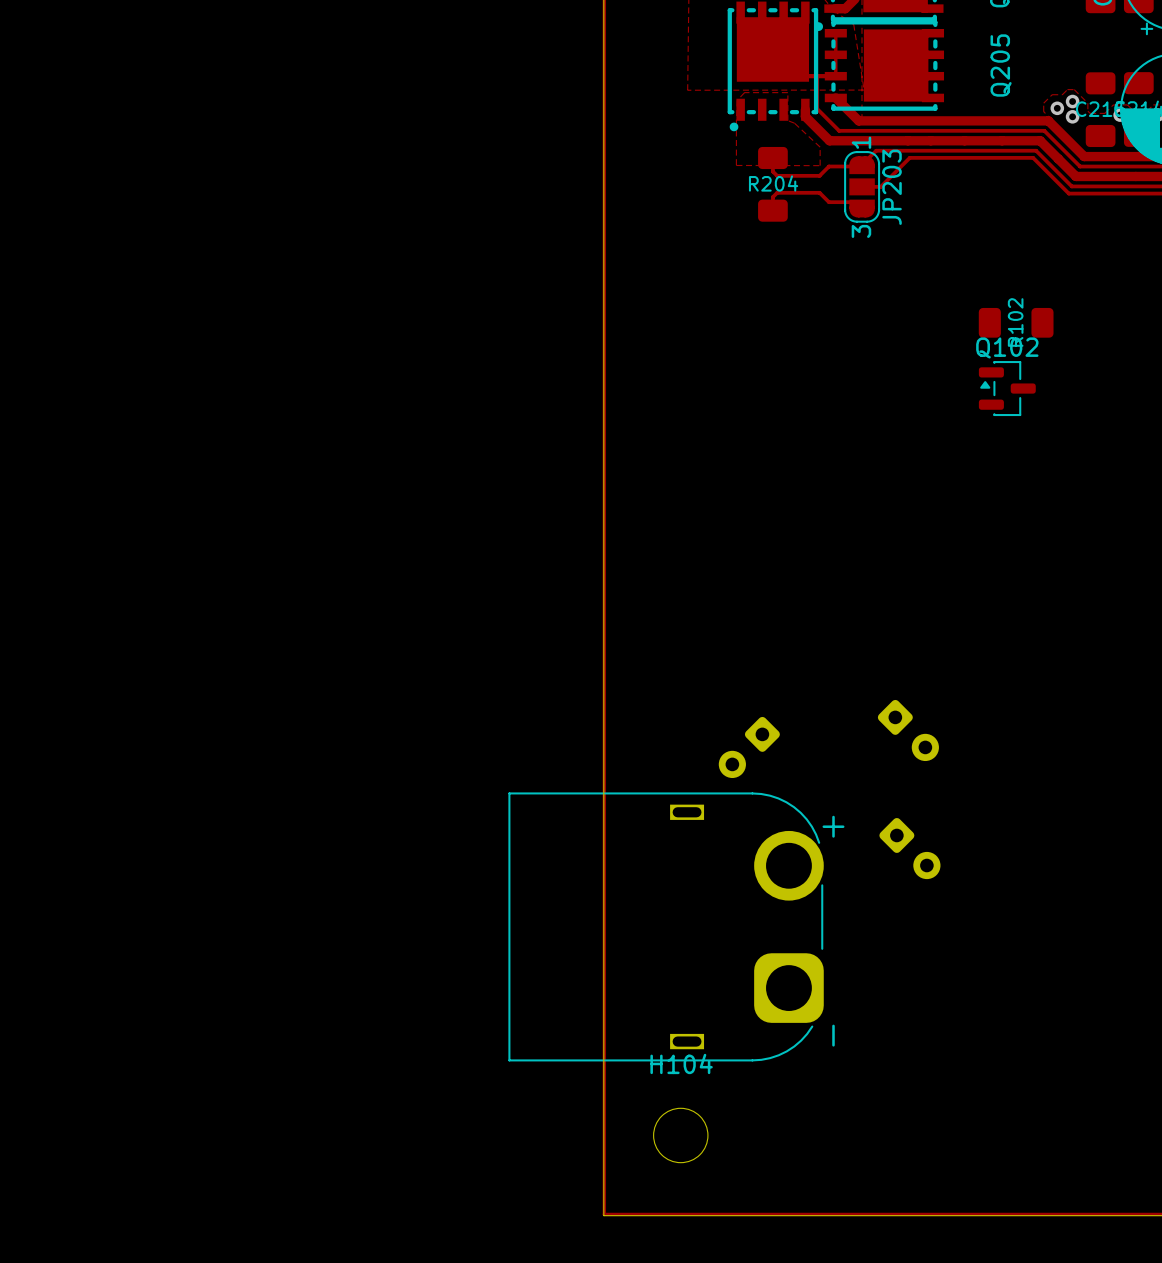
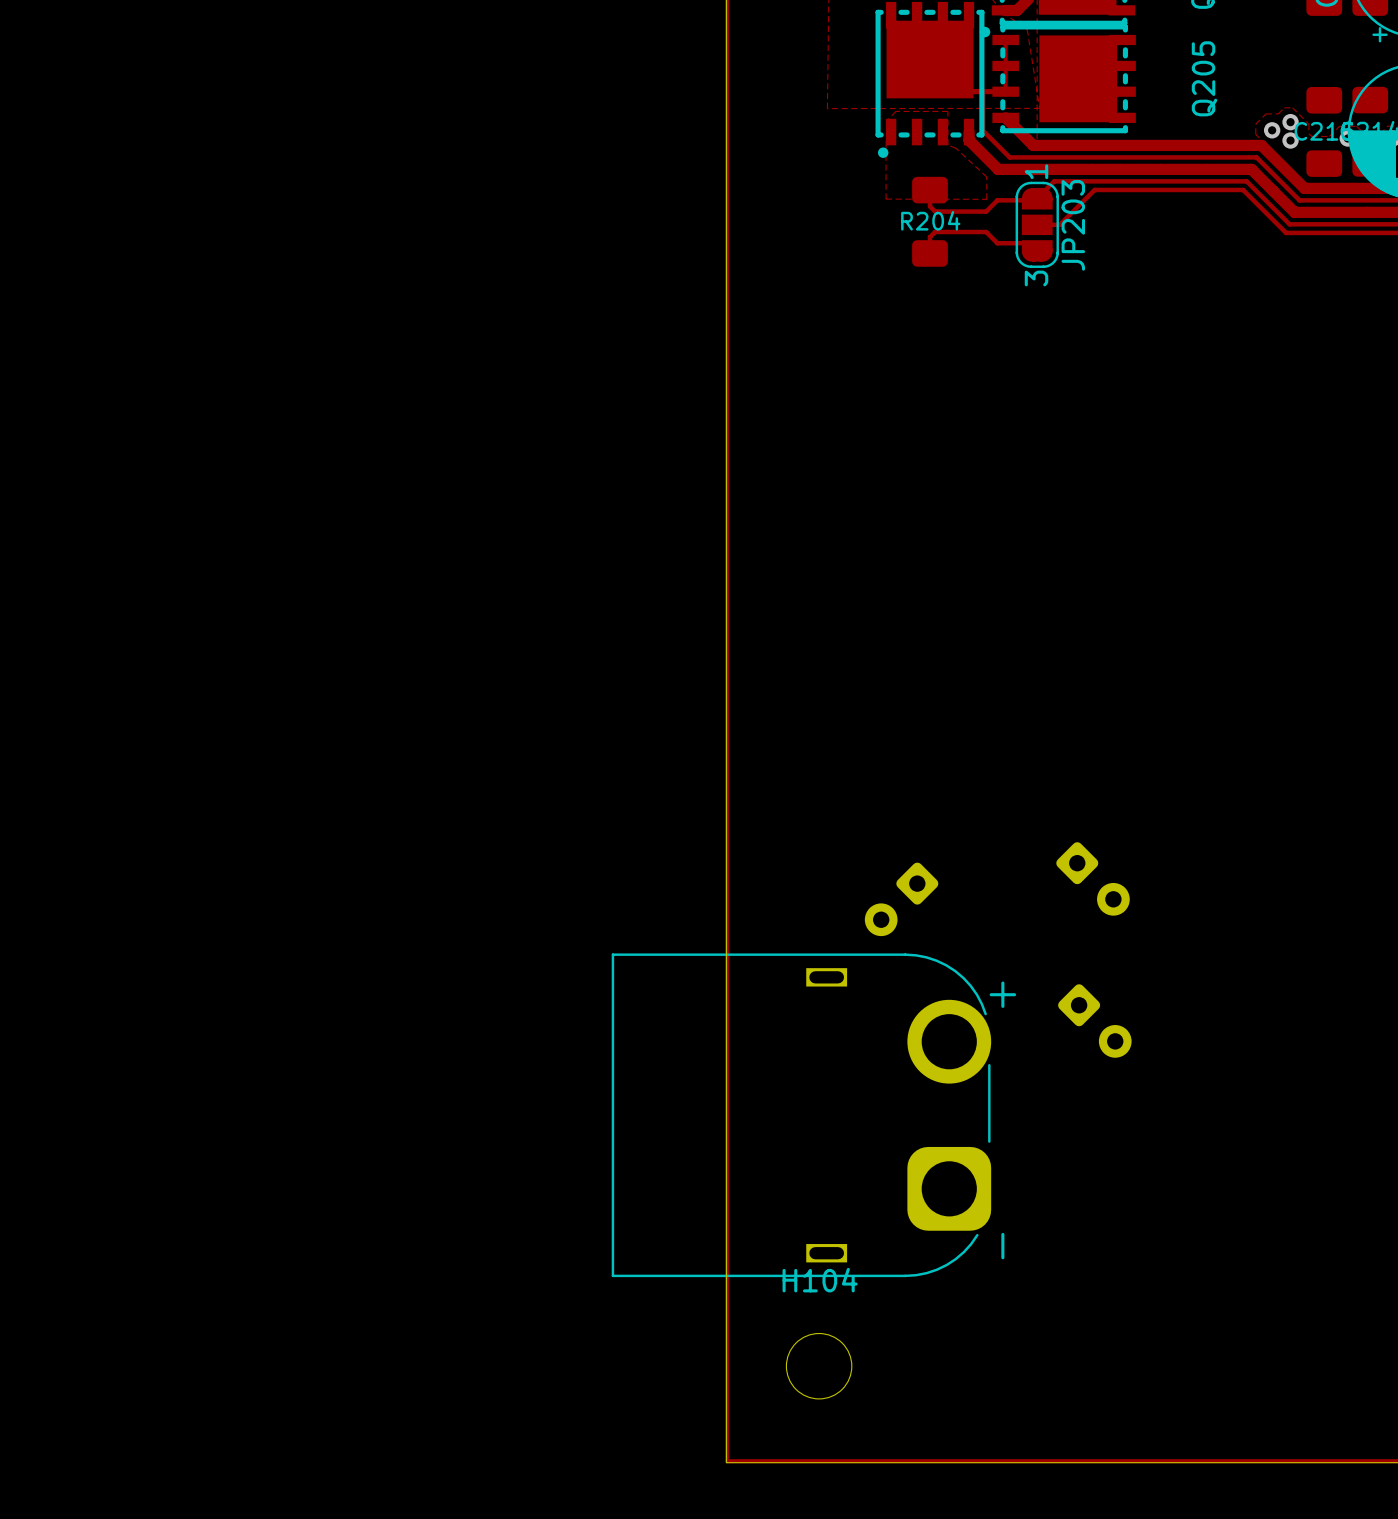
R102: (1016, 322) -> none
Q102: (1007, 388) -> none

